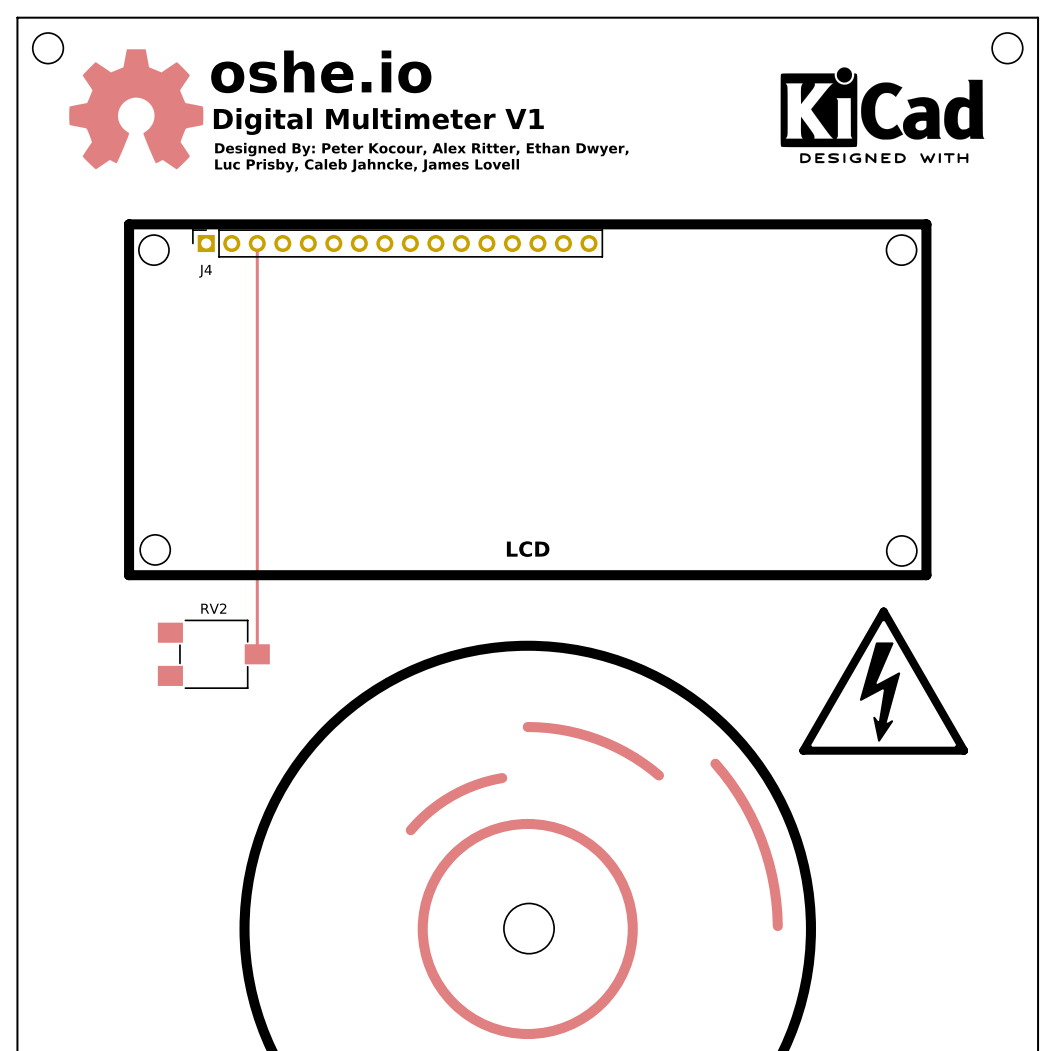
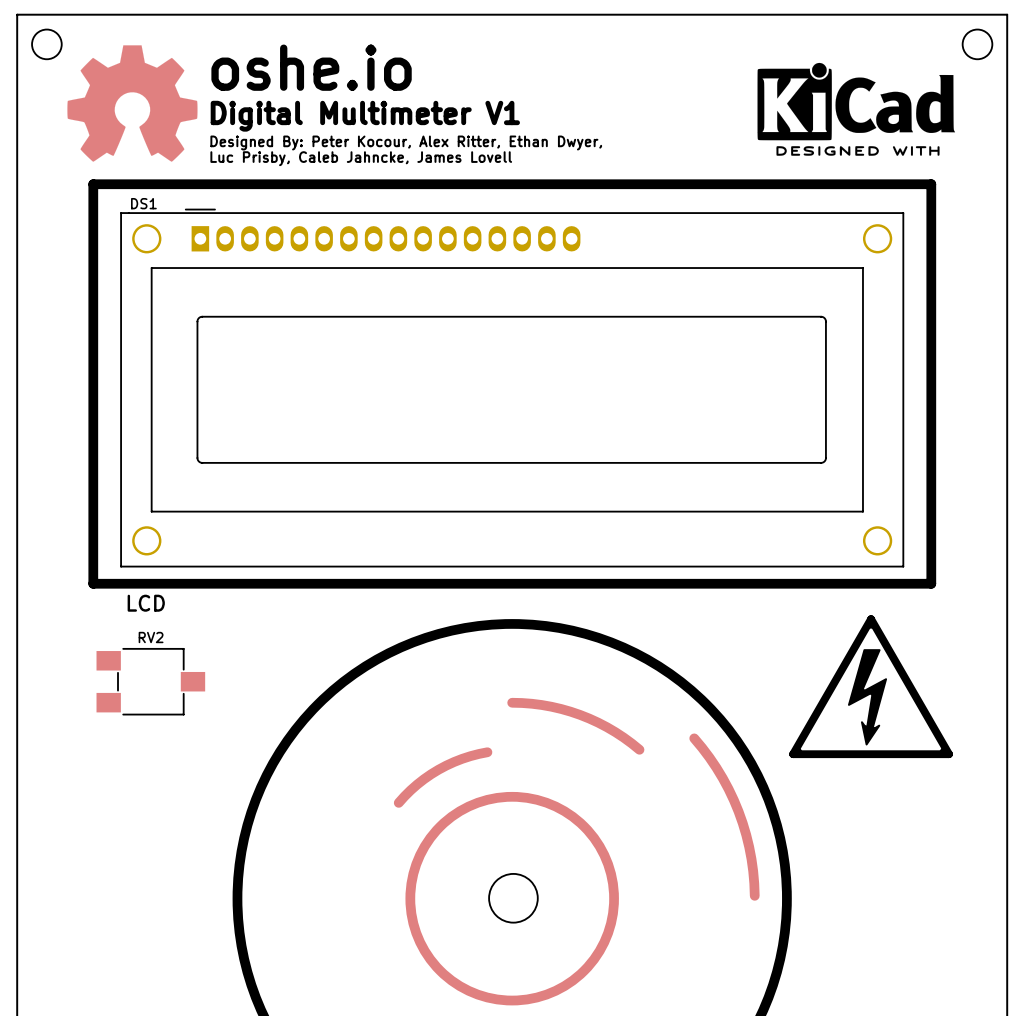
line: (129, 224) (926, 224) (926, 575) (129, 575) (129, 224) -> (93, 184) (93, 583) (931, 583) (931, 184) (93, 184)
round board edge: [138, 234, 170, 266] -> none
round board edge: [886, 234, 917, 266] -> none
track: (257, 243) (257, 654) -> none
J4: (397, 243) -> none
DS1: none -> (512, 388)
round board edge: [139, 534, 171, 566] -> none
round board edge: [886, 535, 918, 567] -> none
text: LCD (528, 549) -> none
text: none -> LCD (146, 603)
RV2 position: (213, 654) -> (150, 681)
drawing position: (883, 681) -> (871, 686)

